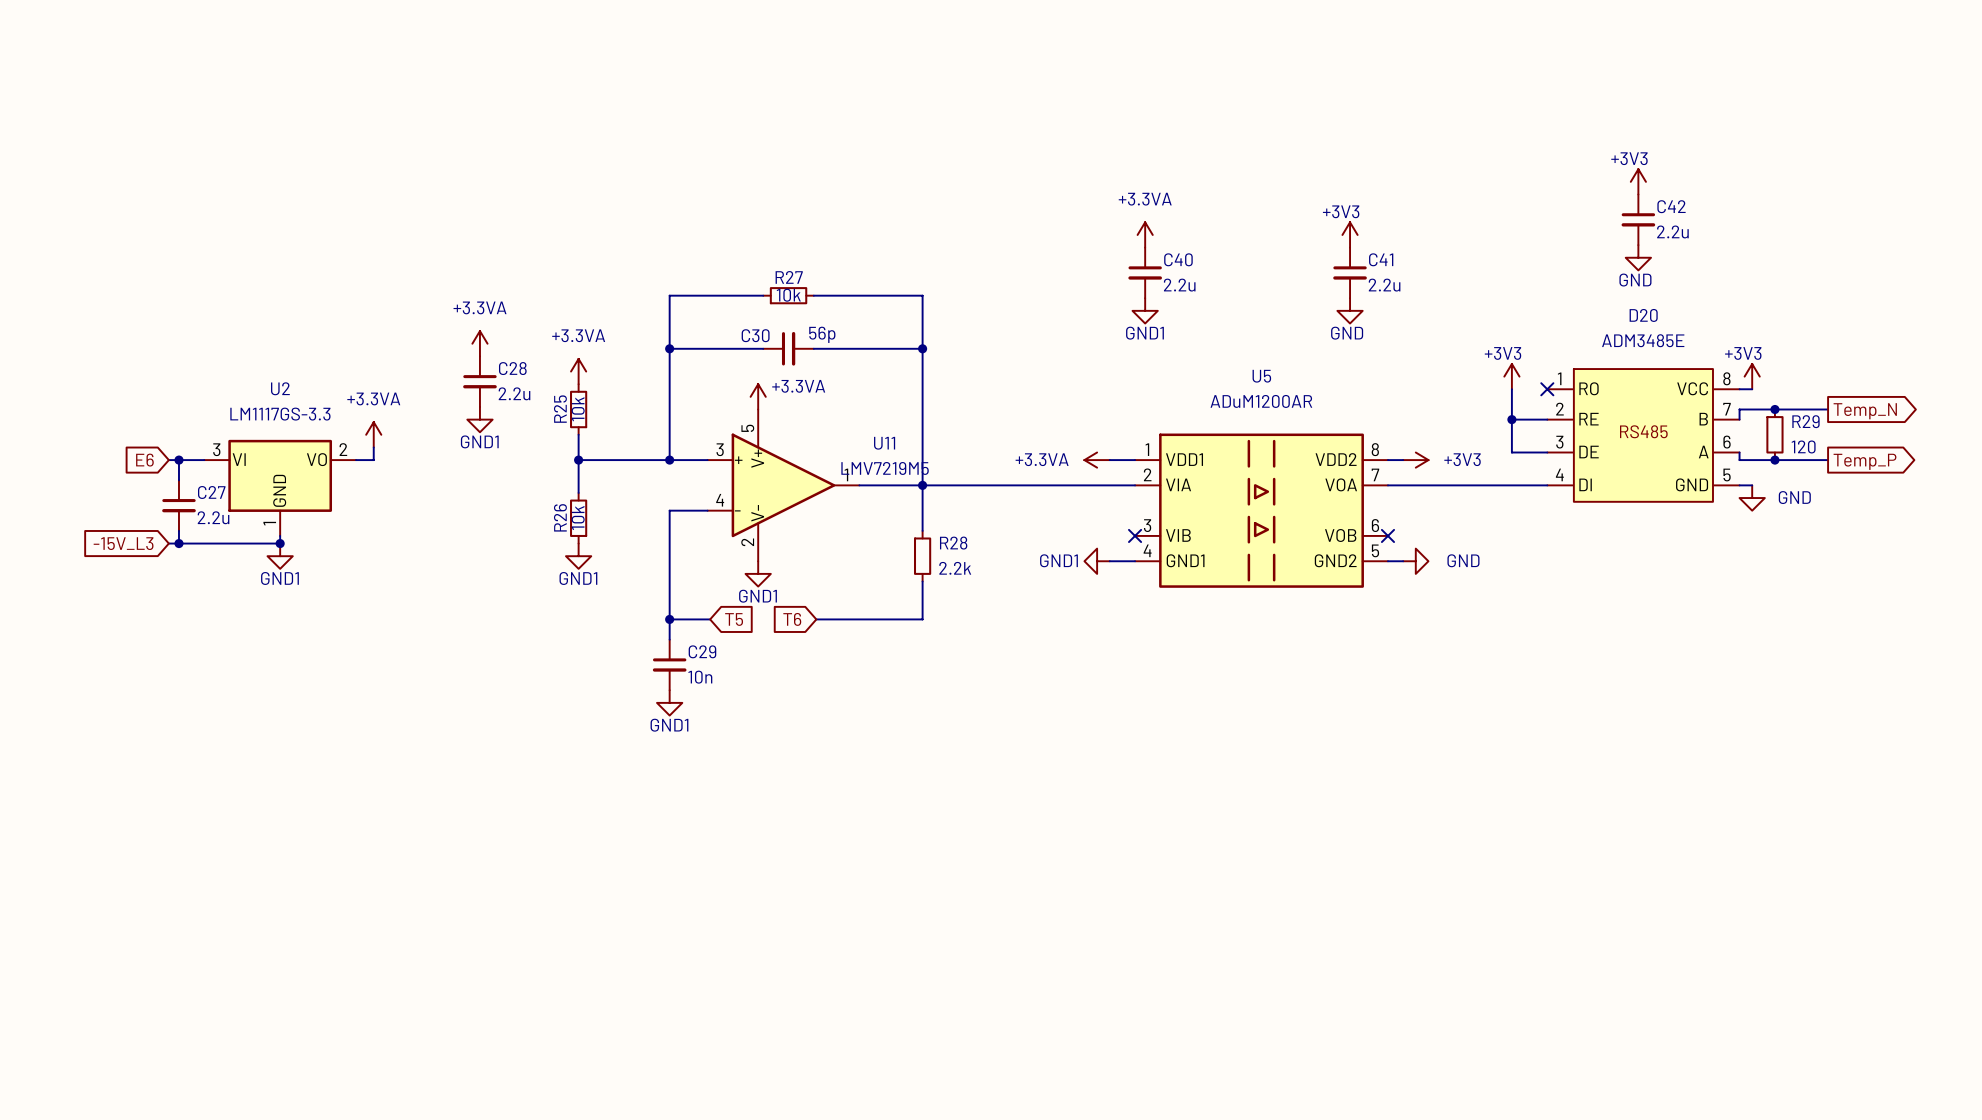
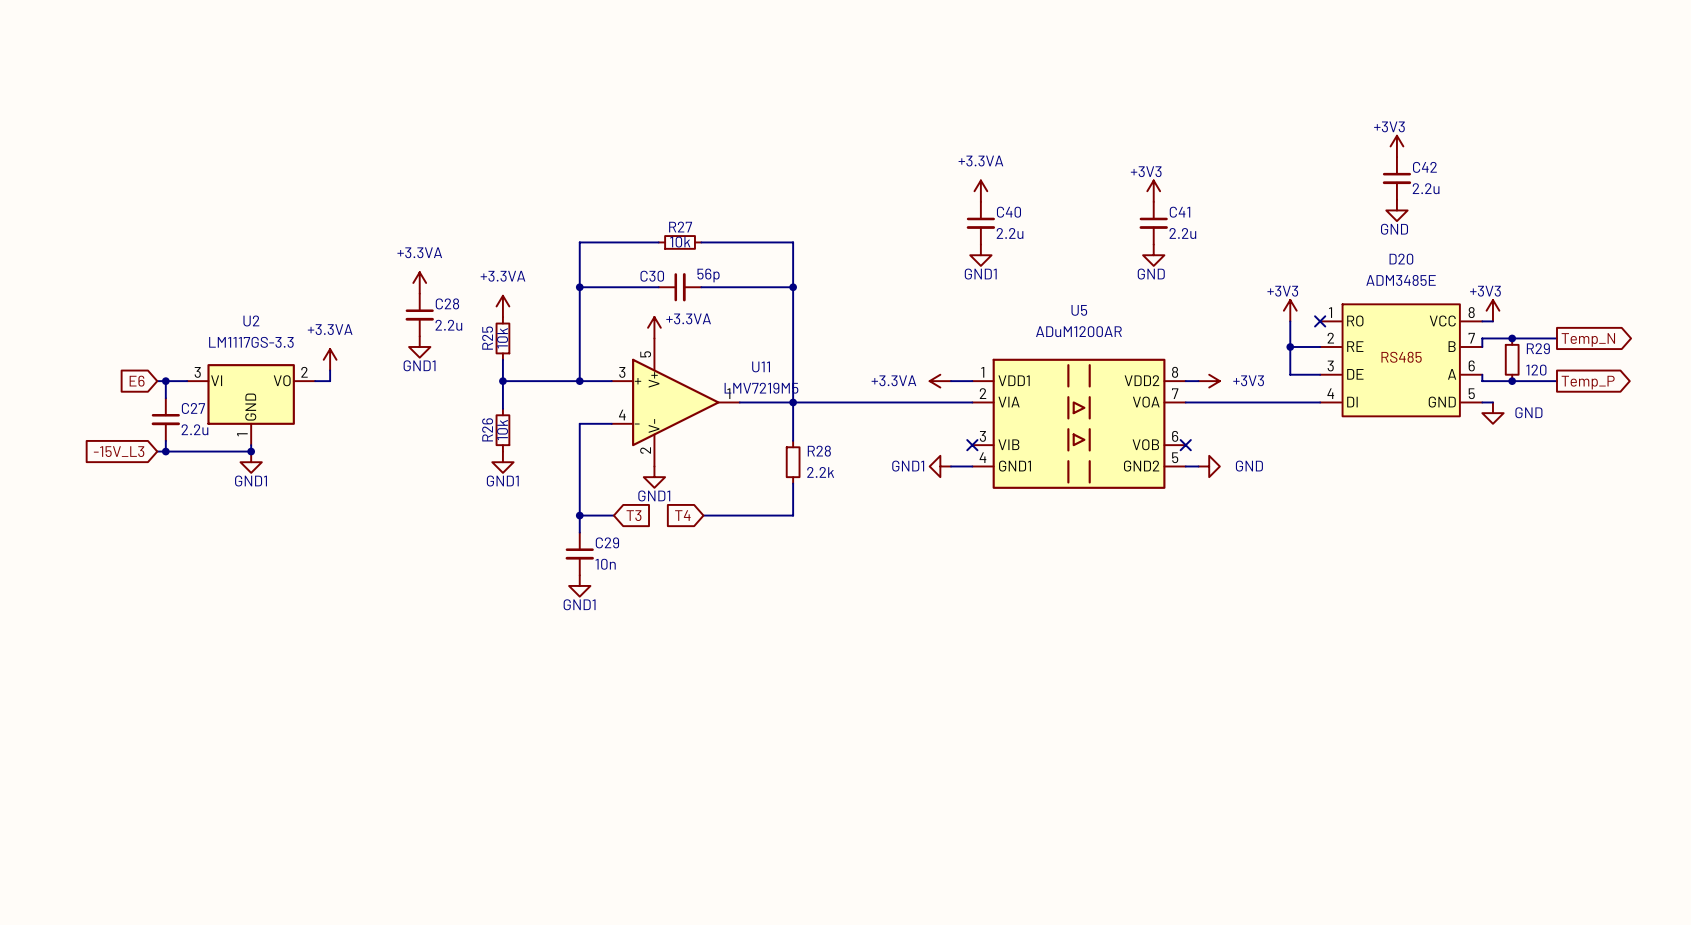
global label: T5 (734, 619) -> T3 (633, 515)
global label: T6 (792, 619) -> T4 (682, 515)

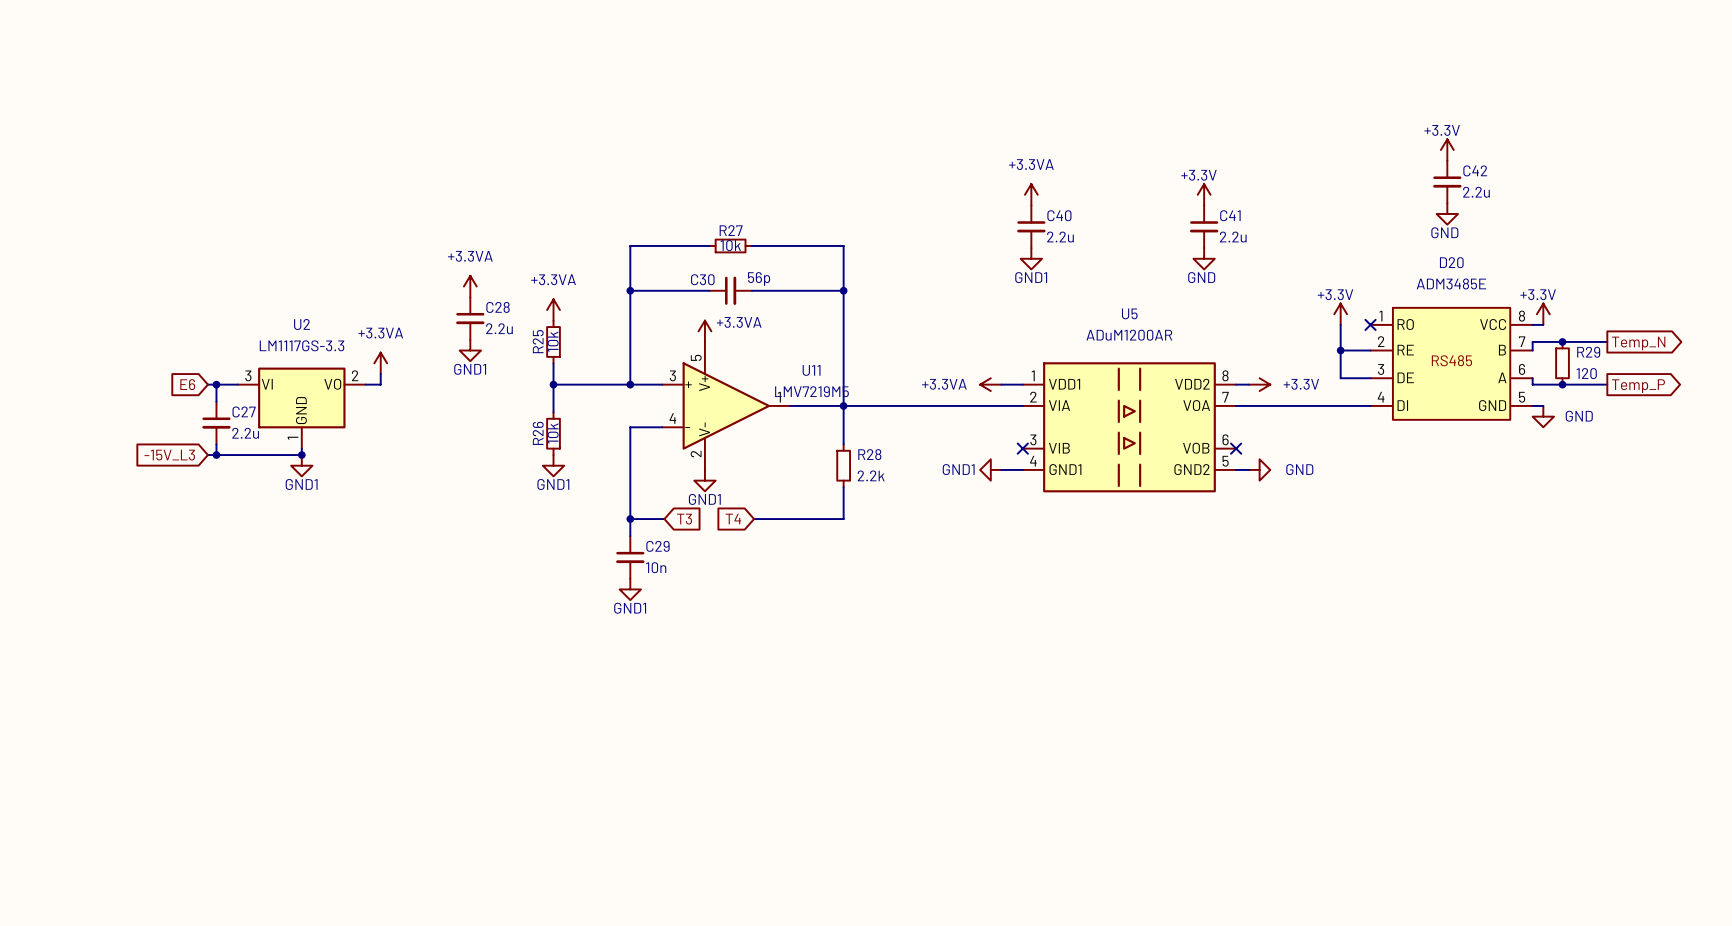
power symbol: +3V3 (1396, 146) -> +3.3V (1447, 149)
power symbol: +3V3 (1153, 191) -> +3.3V (1204, 194)
power symbol: +3V3 (1290, 310) -> +3.3V (1340, 314)
power symbol: +3V3 (1492, 310) -> +3.3V (1543, 314)
power symbol: +3V3 (1209, 381) -> +3.3V (1259, 384)

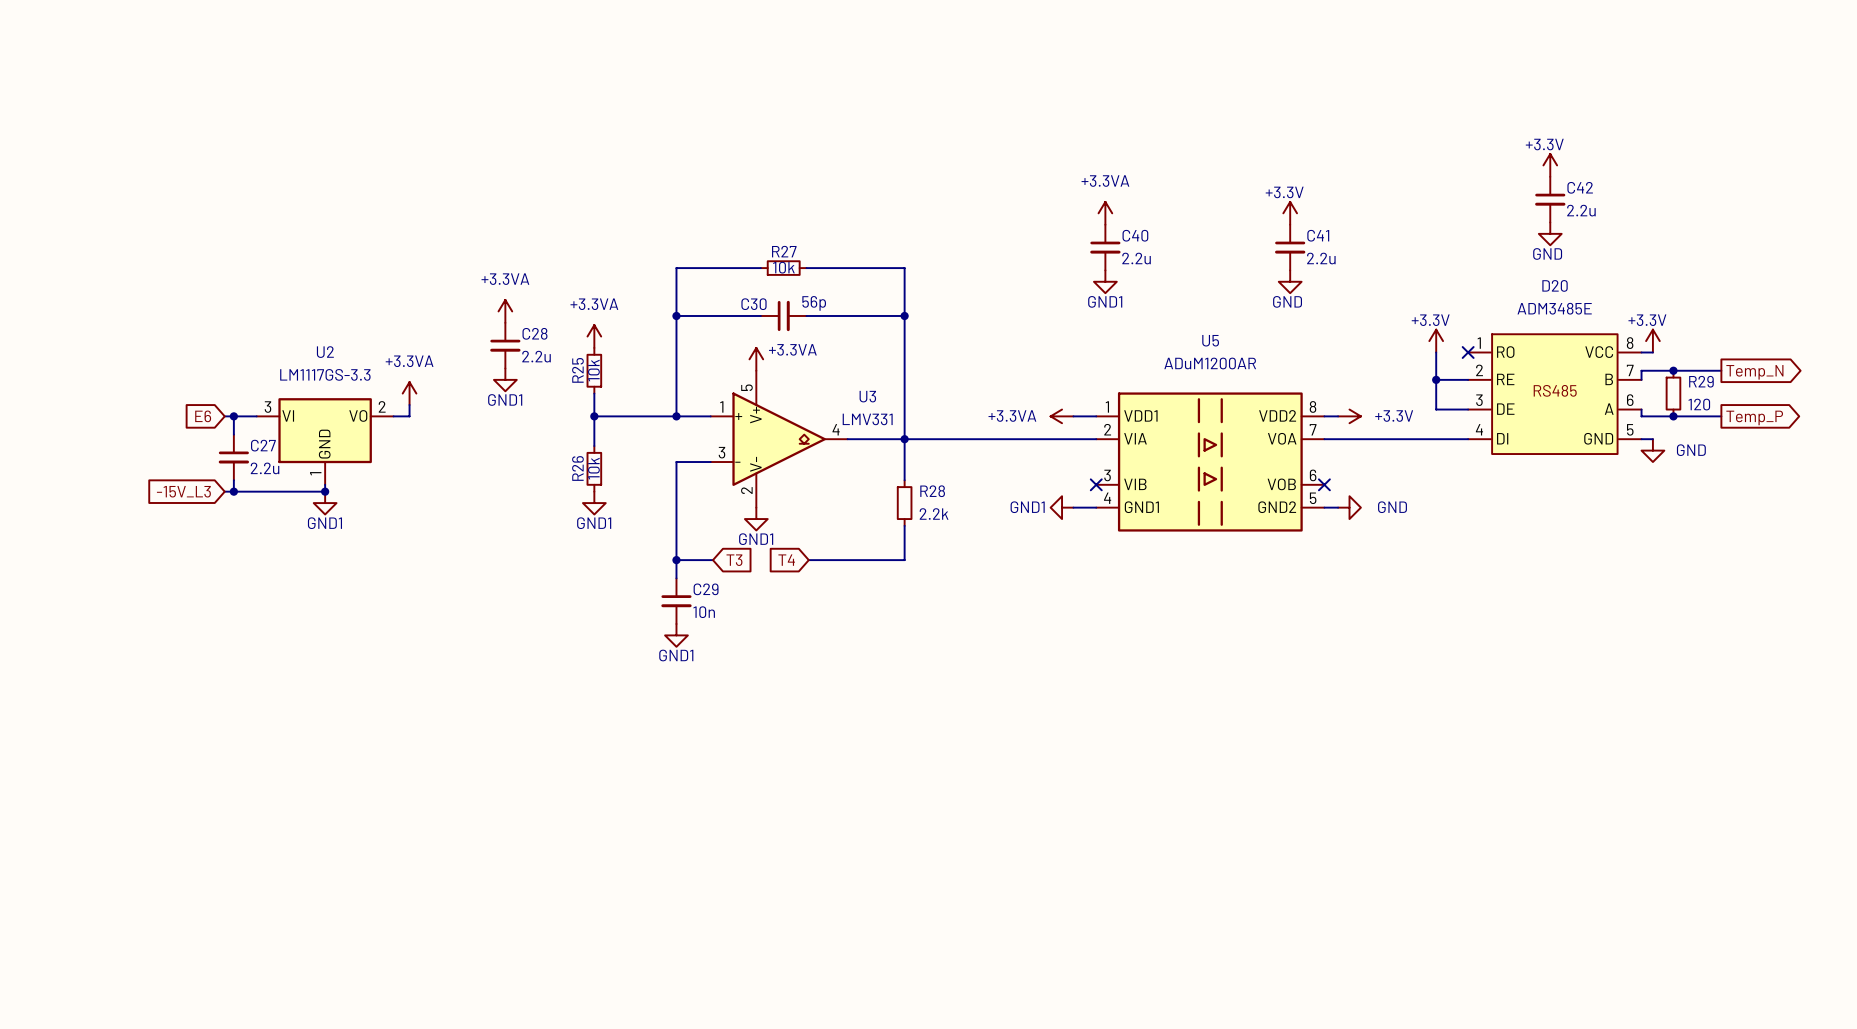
U11: LMV7219M5 (726, 405) -> none
U3: none -> LMV331 (779, 439)

